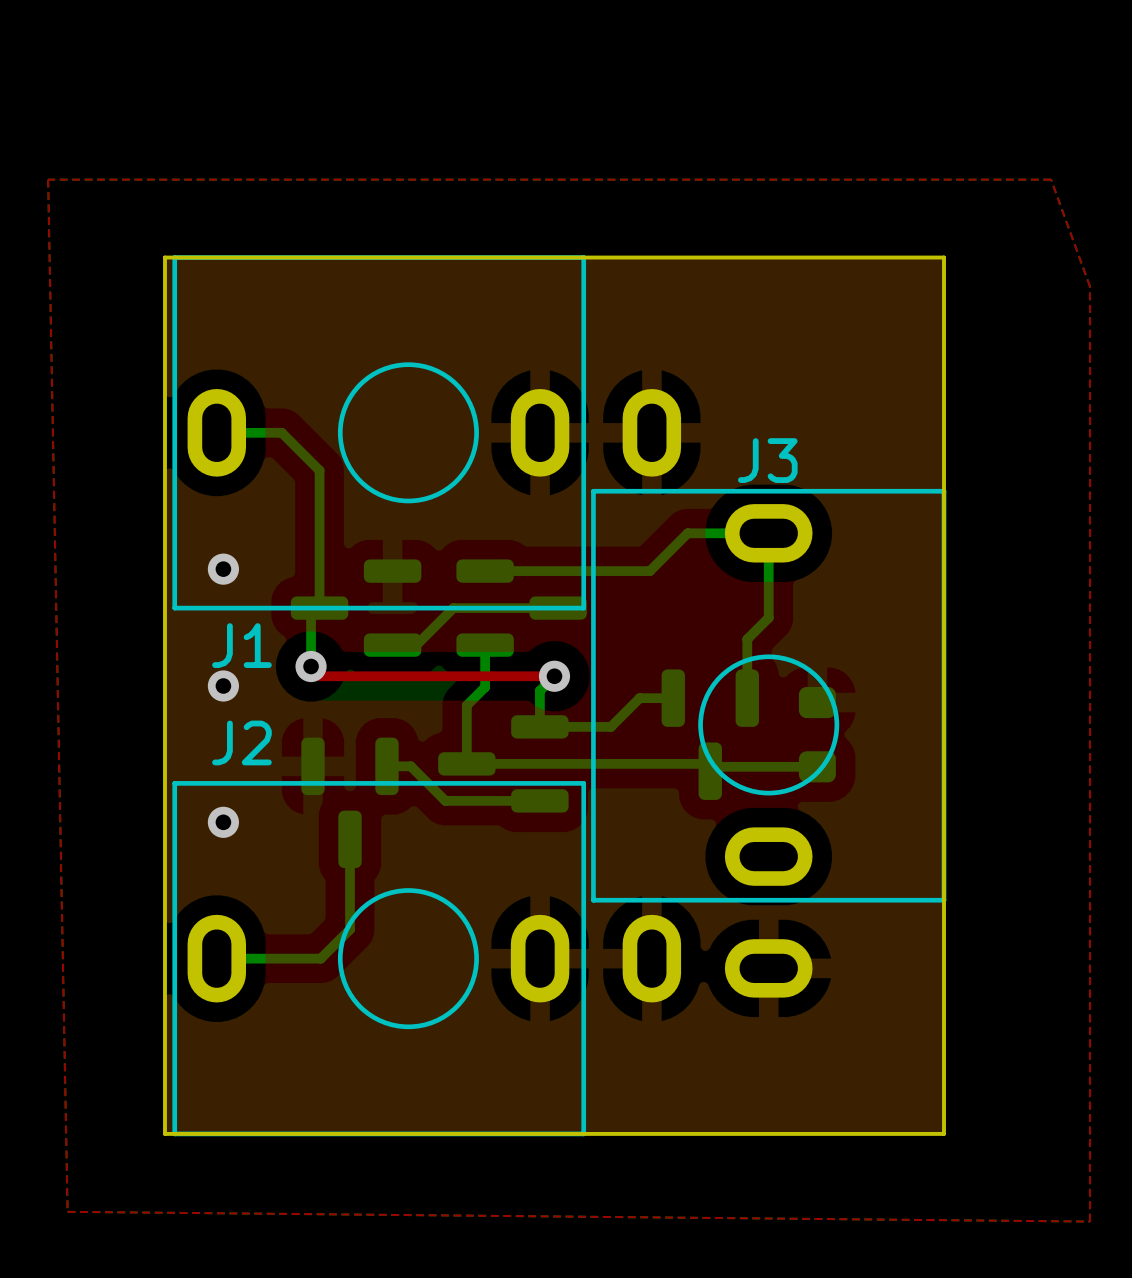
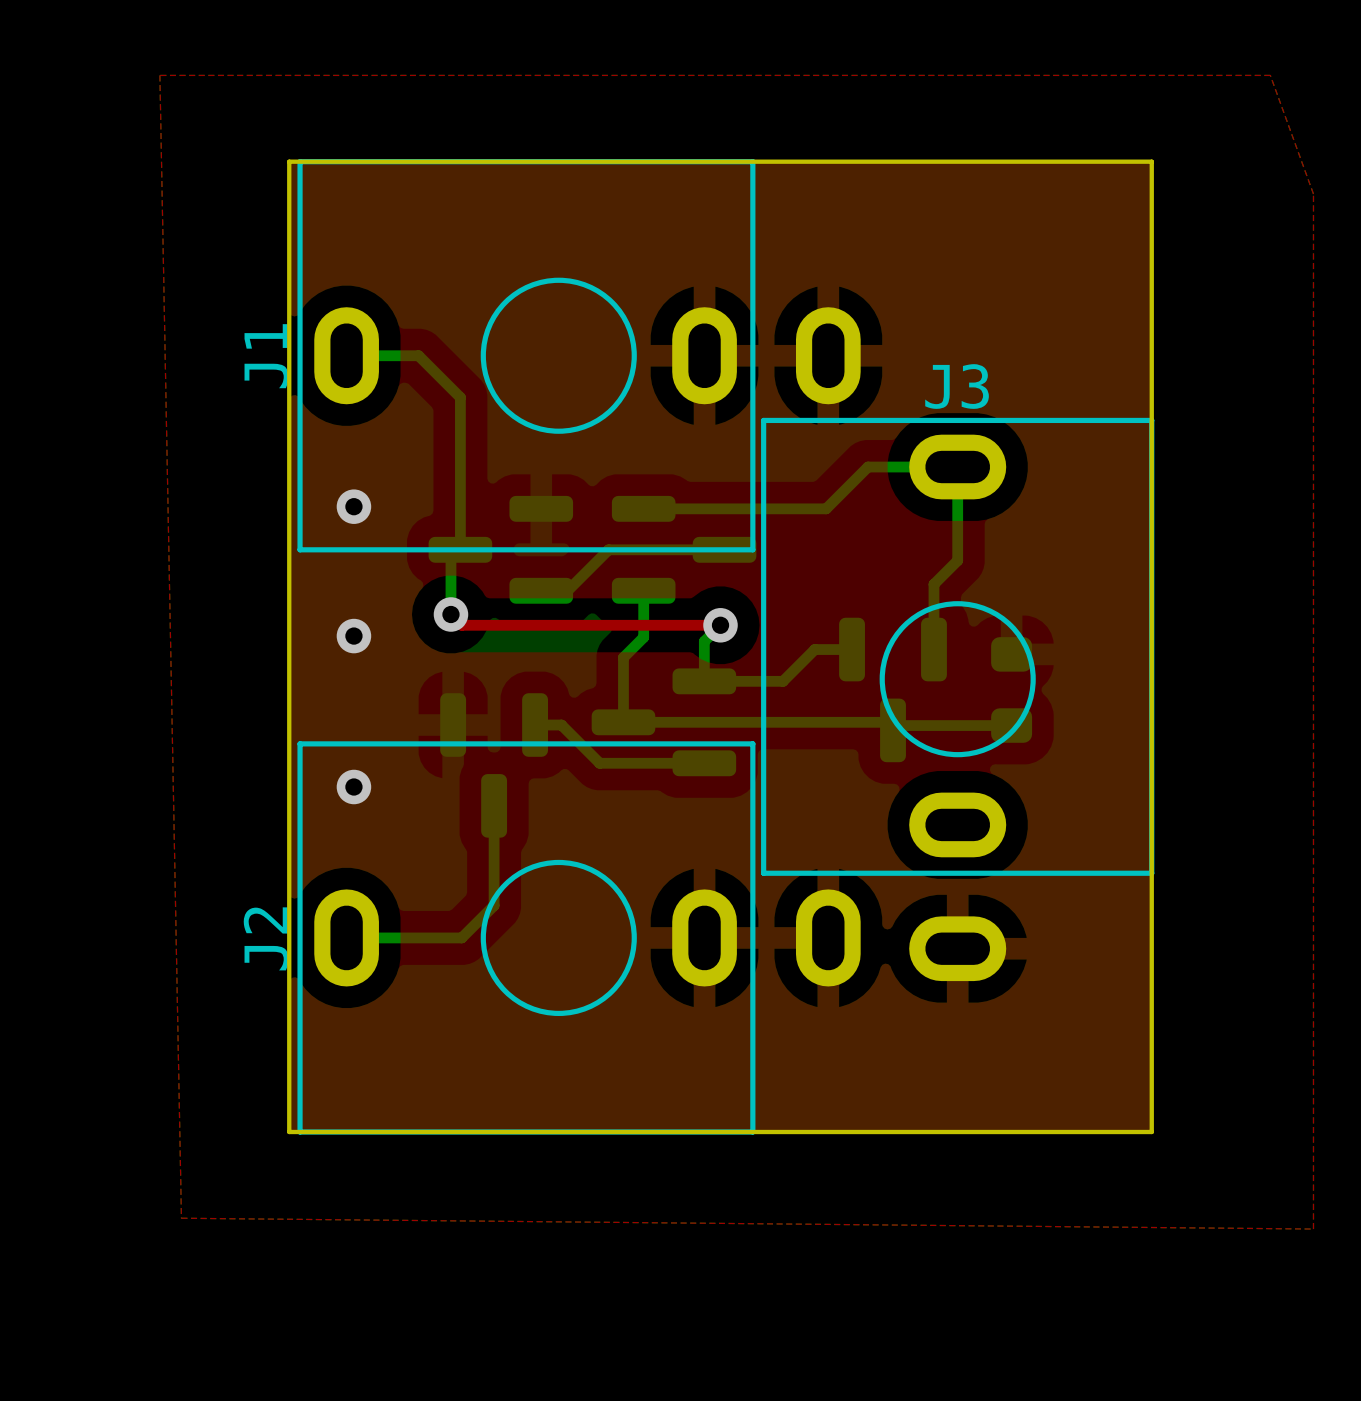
J1 name rotation: 0° (241, 645) -> 90° counterclockwise (266, 356)
J1 name position: J1 (241, 645) -> J1 (266, 356)
J2 name rotation: 0° (241, 742) -> 90° counterclockwise (266, 938)
J2 name position: J2 (241, 742) -> J2 (266, 938)

